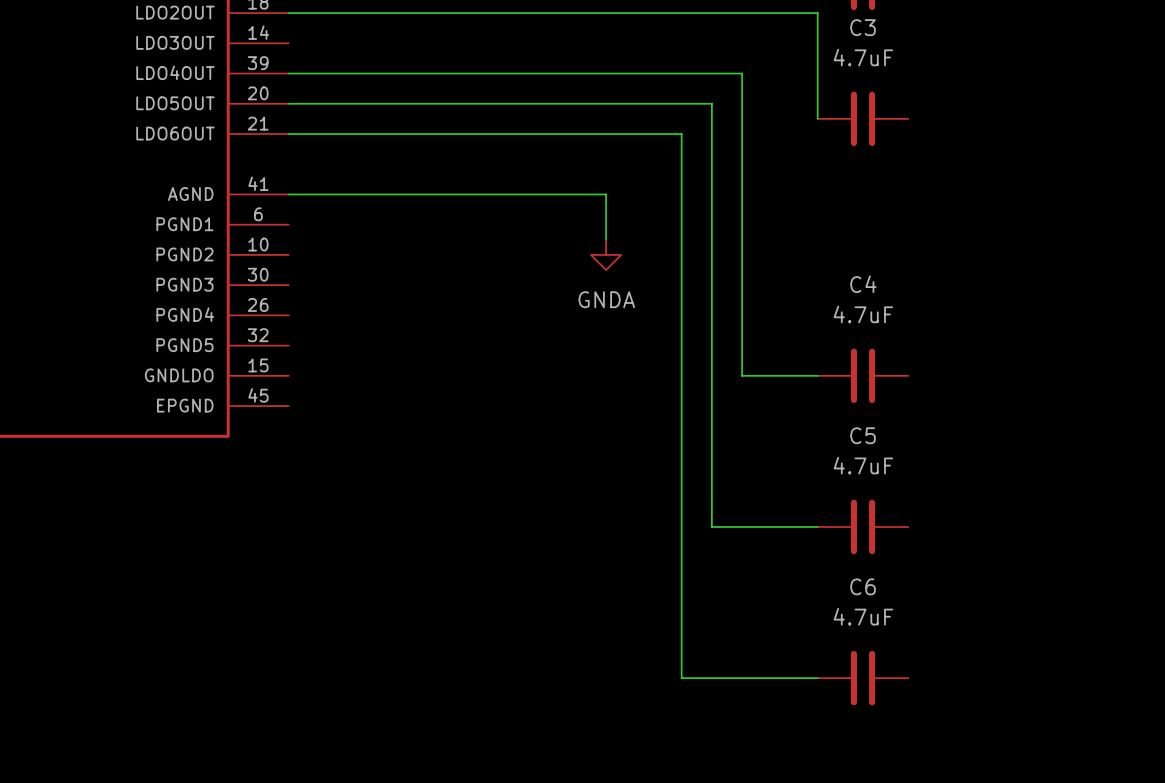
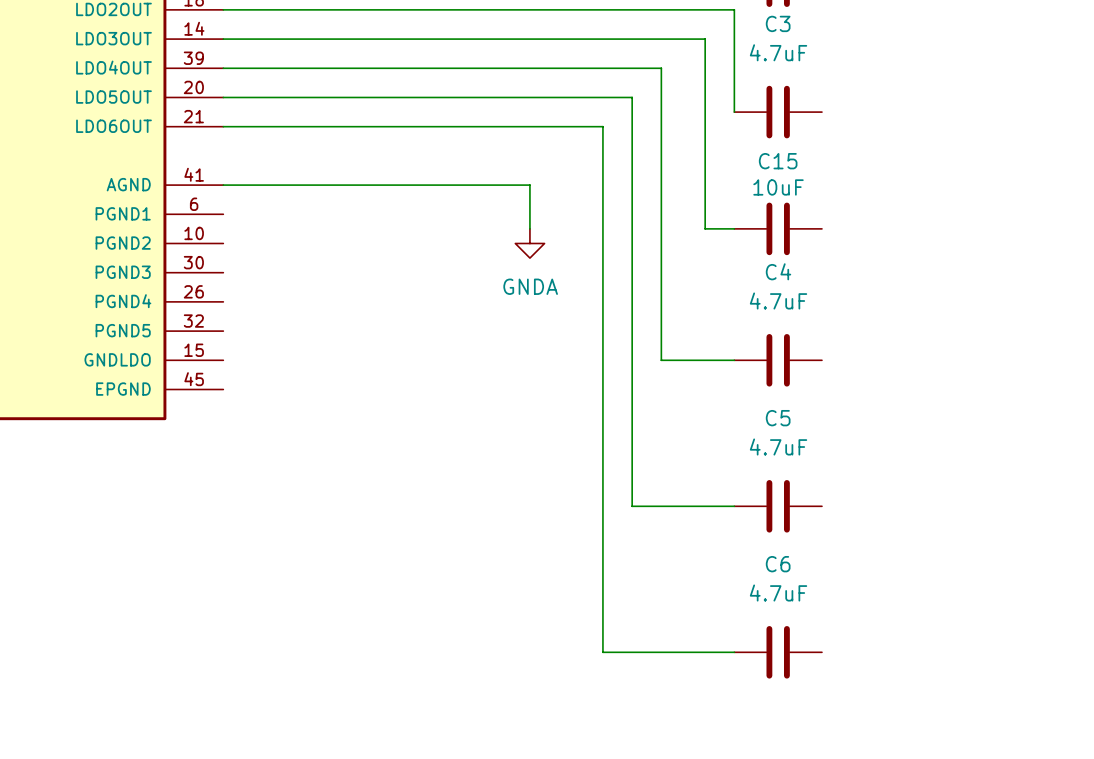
wire: none -> (223, 39) (705, 39) (705, 228) (734, 228)
C15: none -> 10uF (778, 228)

